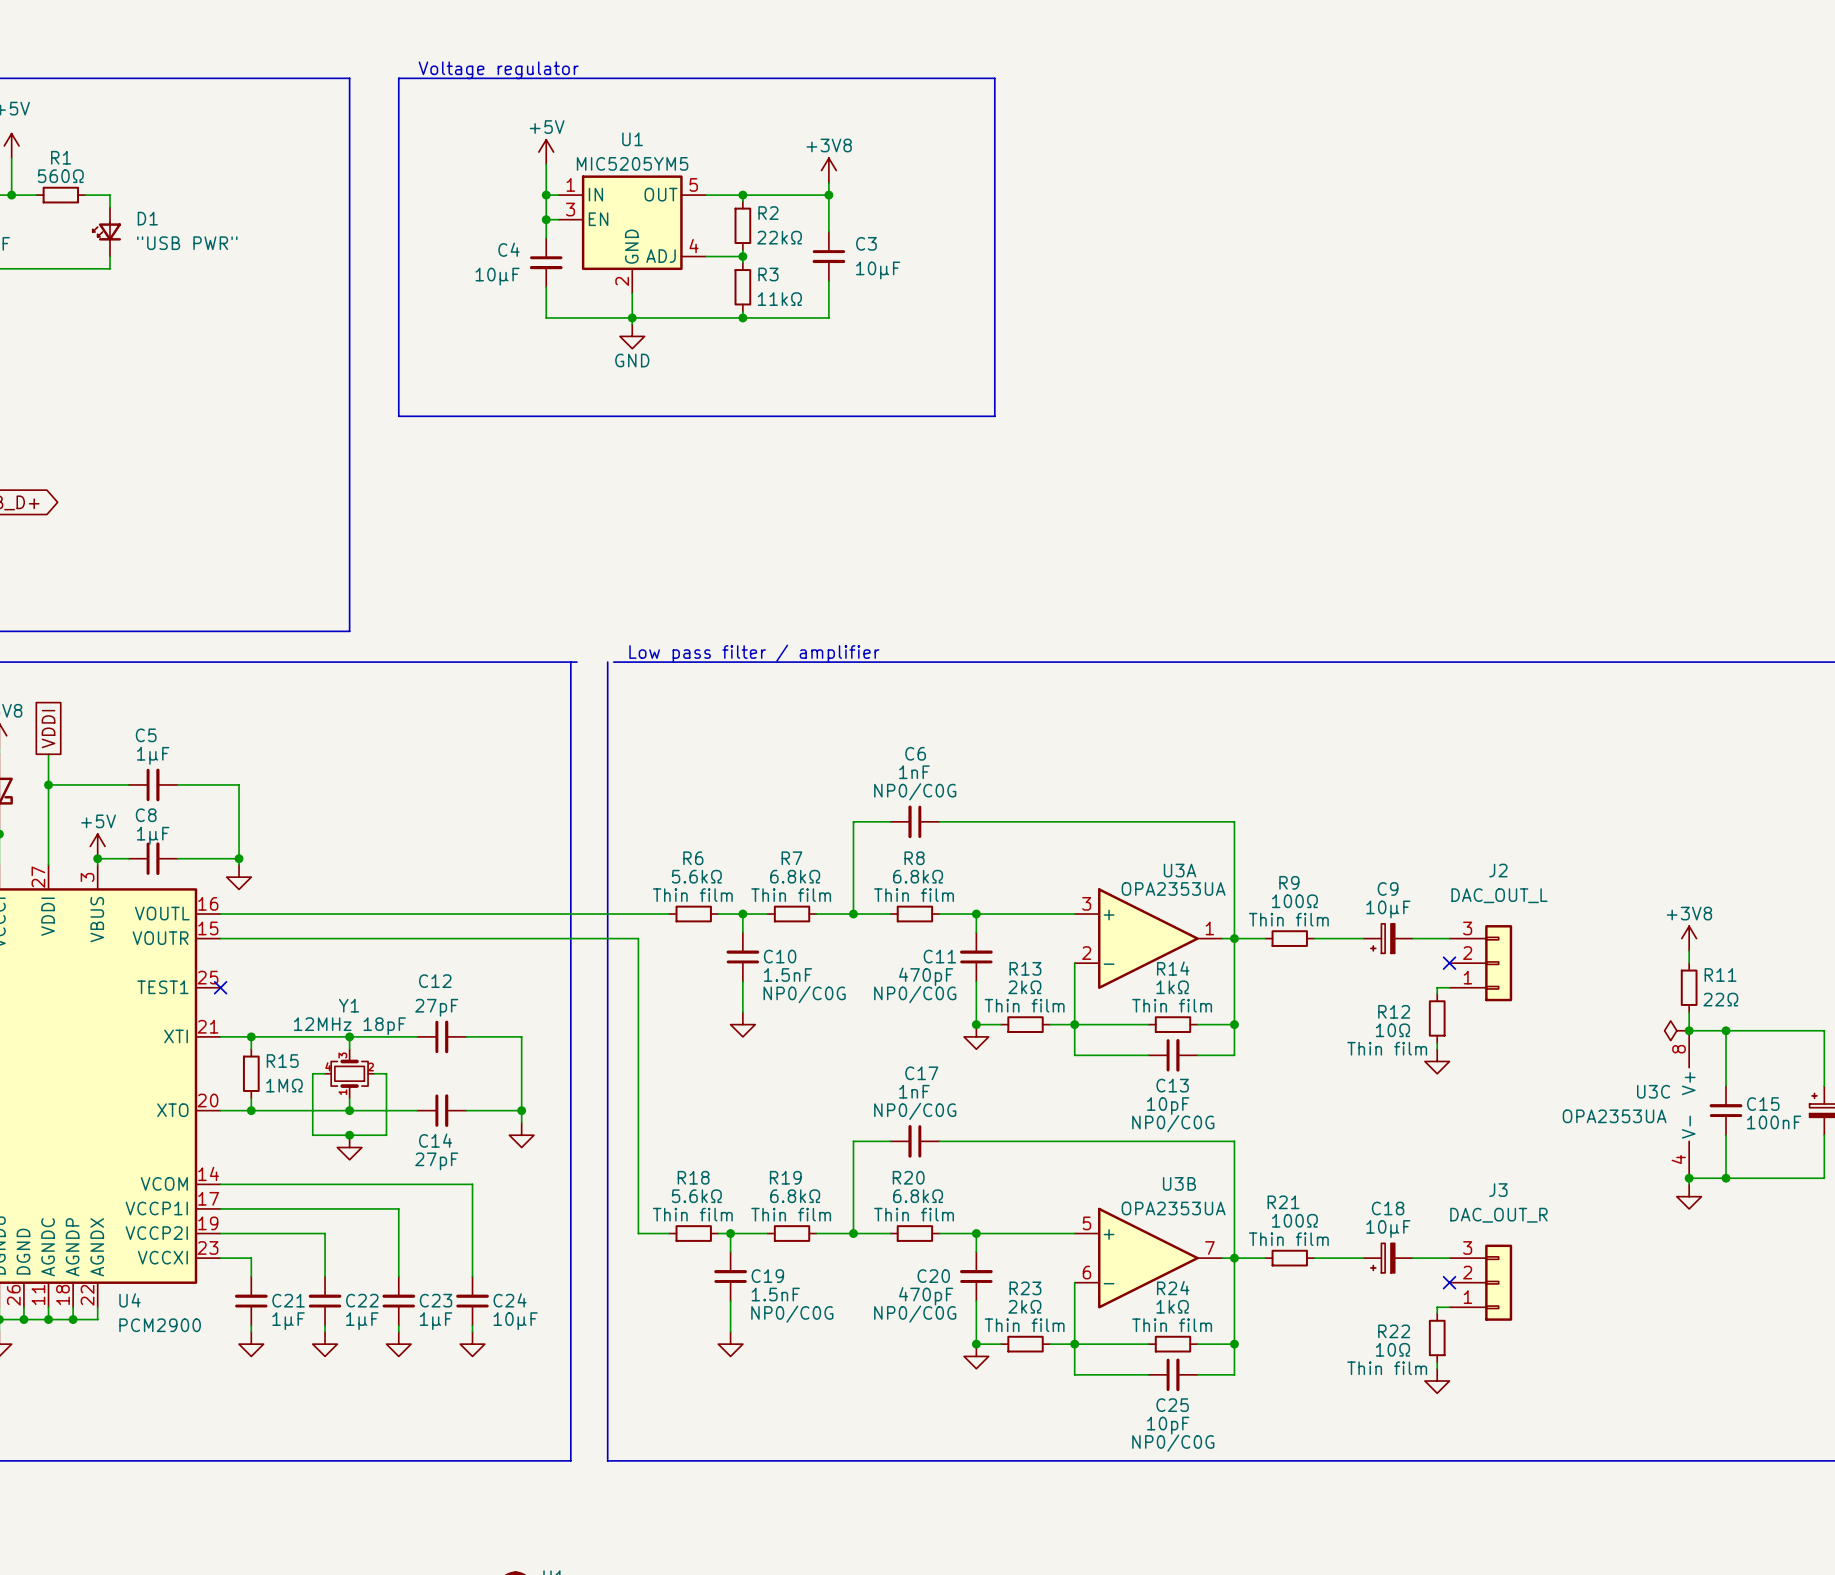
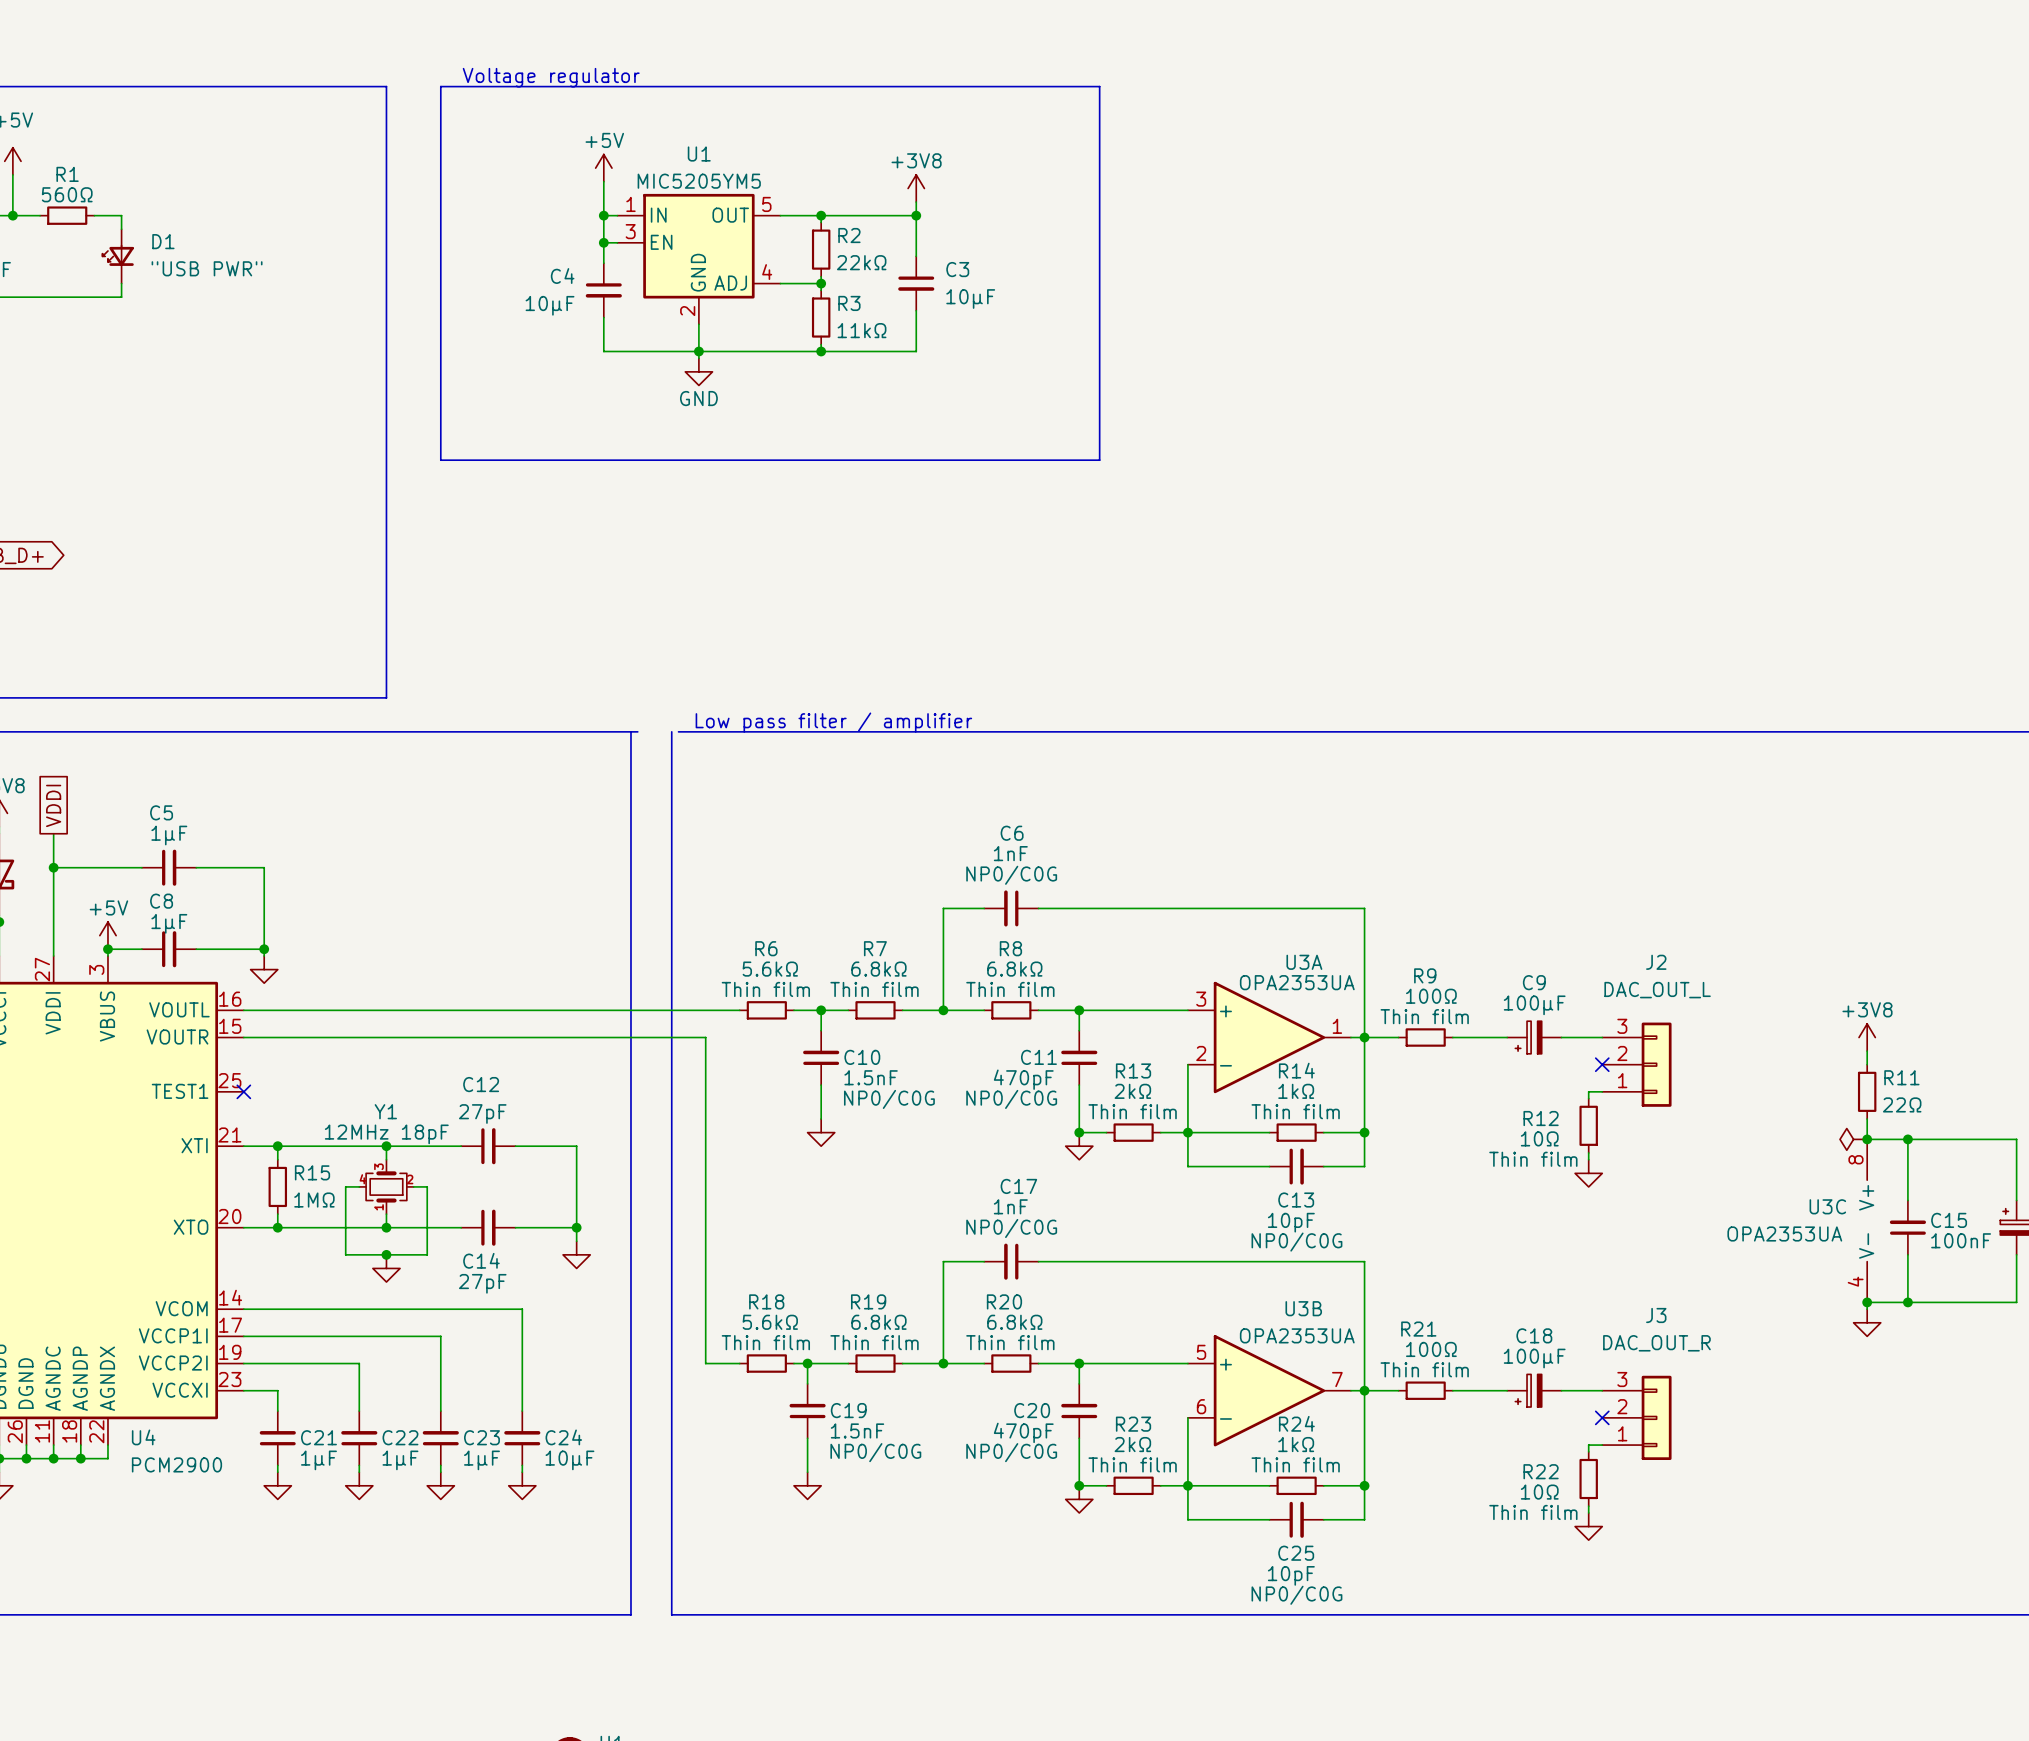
C9 value: 10µF (1388, 909) -> 100µF (1534, 1005)
C18 value: 10µF (1388, 1228) -> 100µF (1534, 1358)

